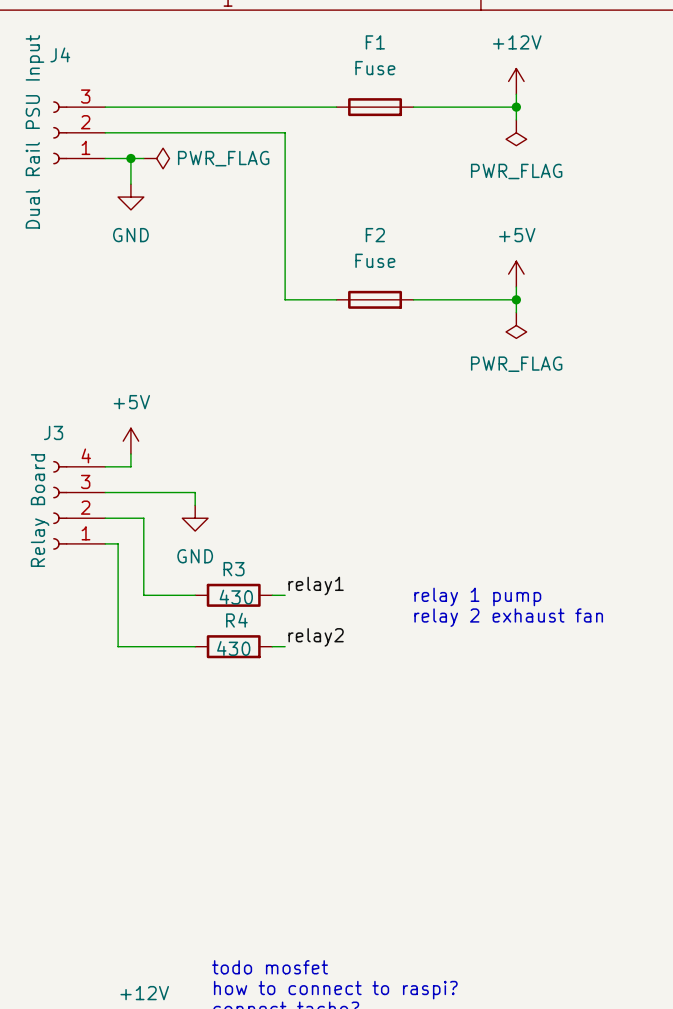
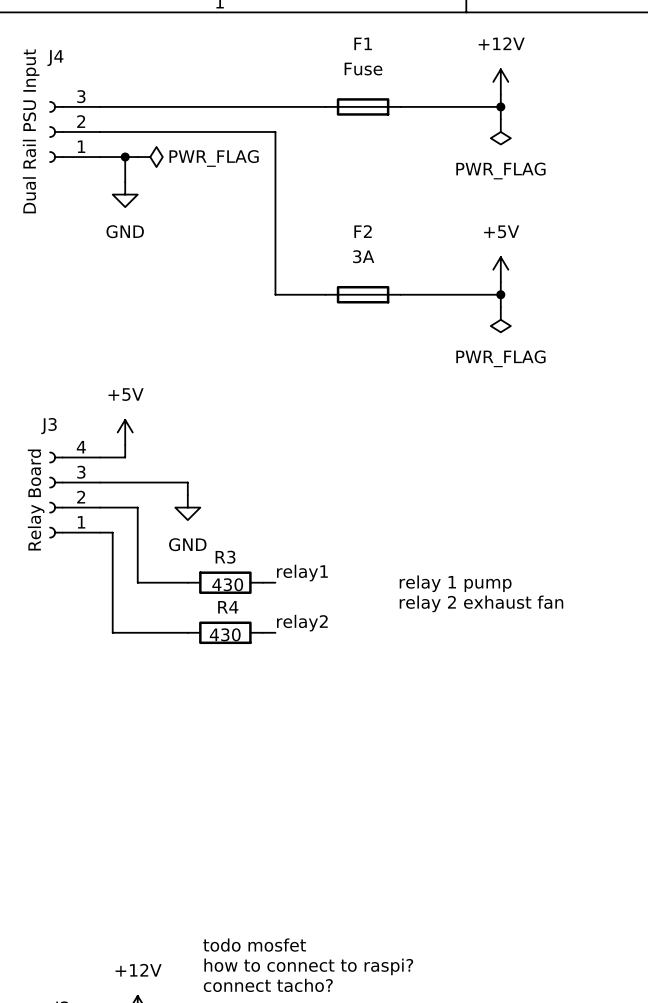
F2 value: Fuse (375, 260) -> 3A (363, 256)

